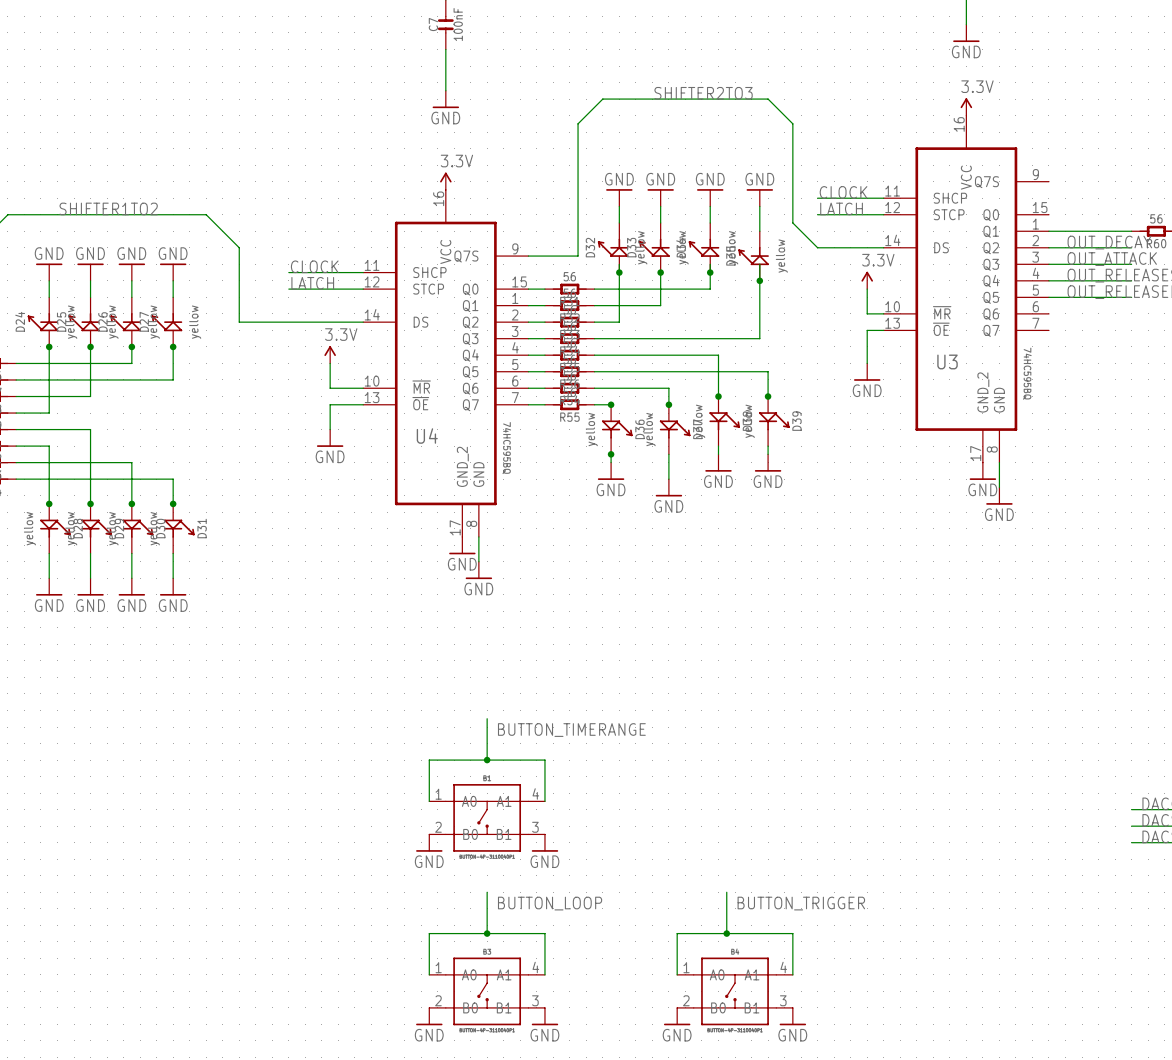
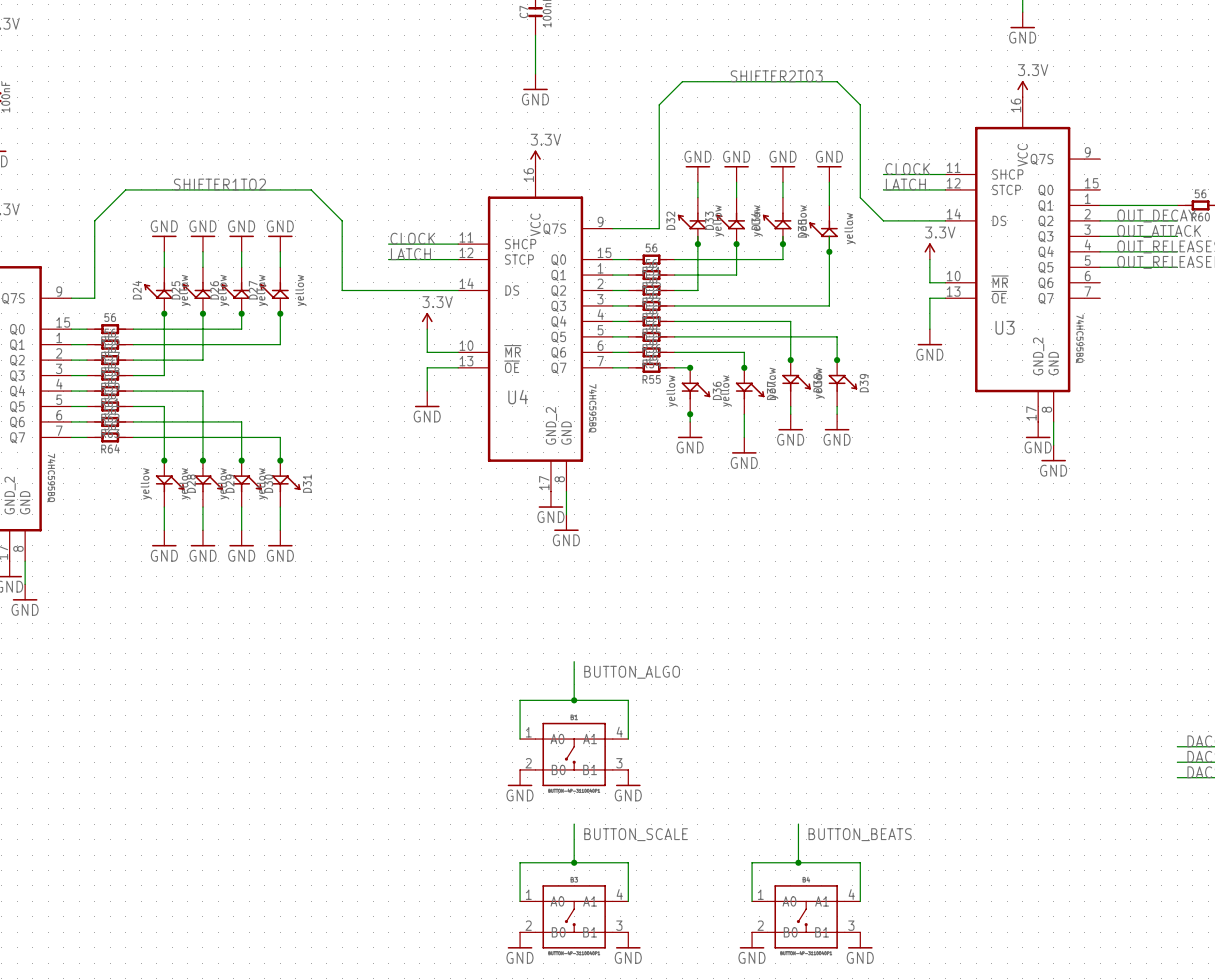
label: BUTTON_TIMERANGE (571, 730) -> BUTTON_ALGO (632, 672)
label: BUTTON_LOOP (550, 903) -> BUTTON_SCALE (636, 834)
label: BUTTON_TRIGGER (801, 903) -> BUTTON_BEATS (860, 834)

